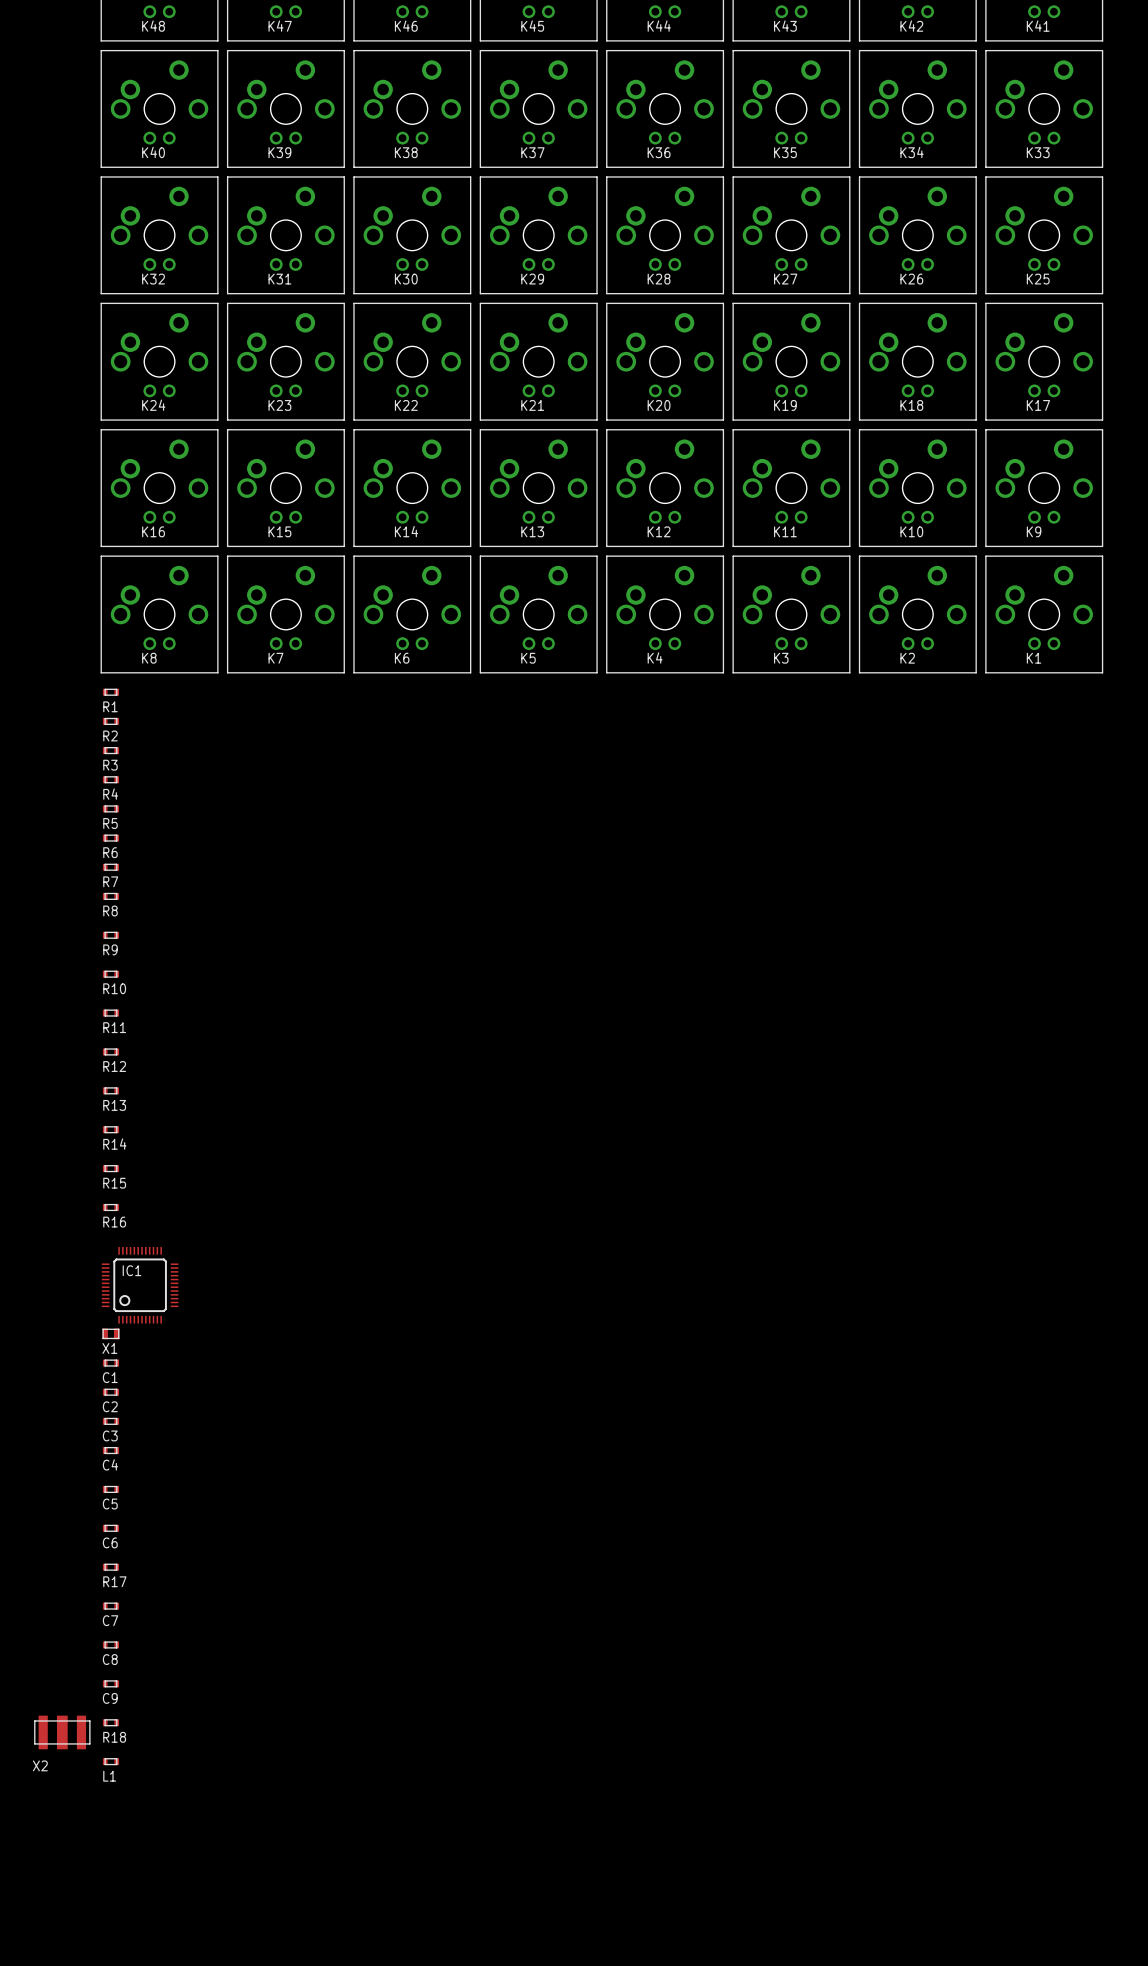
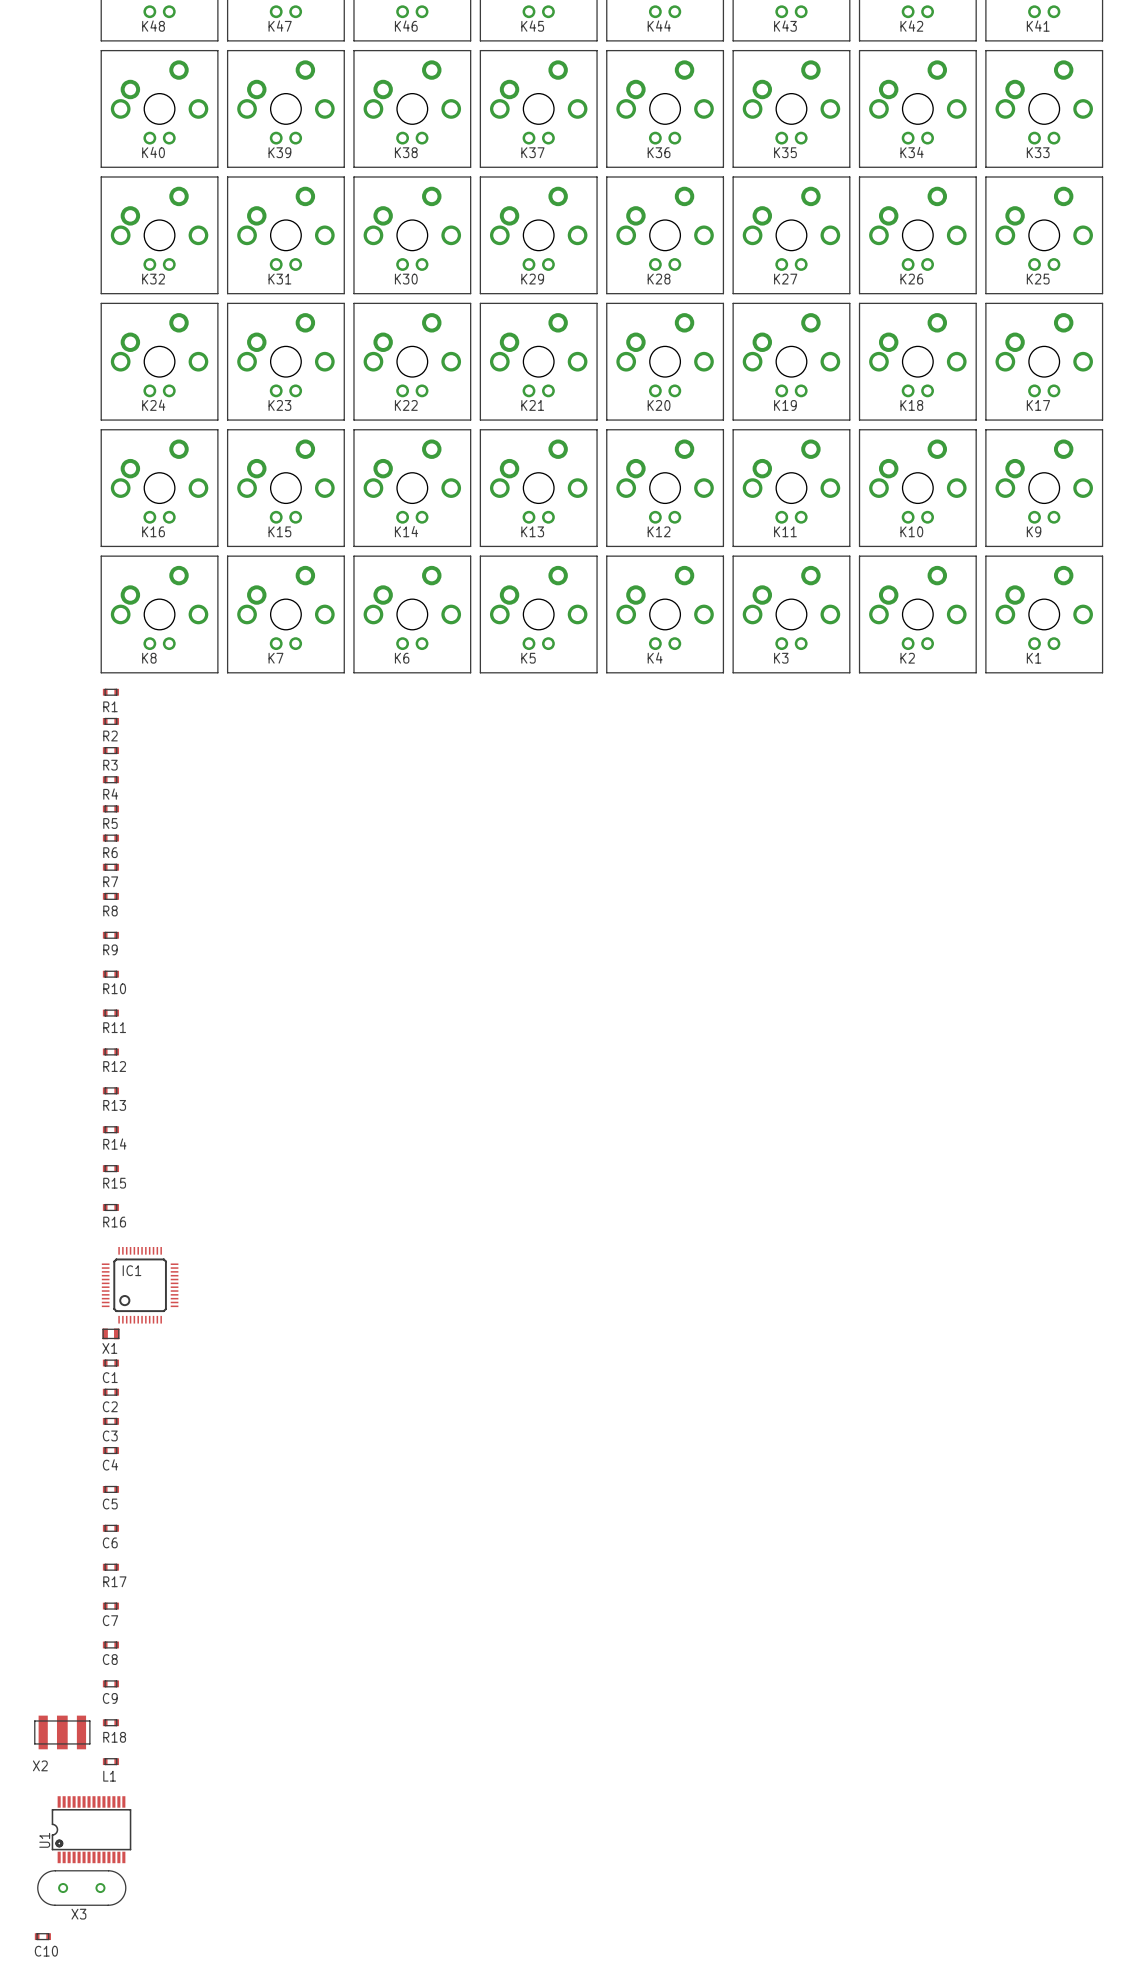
U1: none -> (91, 1829)
X3: none -> (81, 1888)
C10: none -> (42, 1936)

